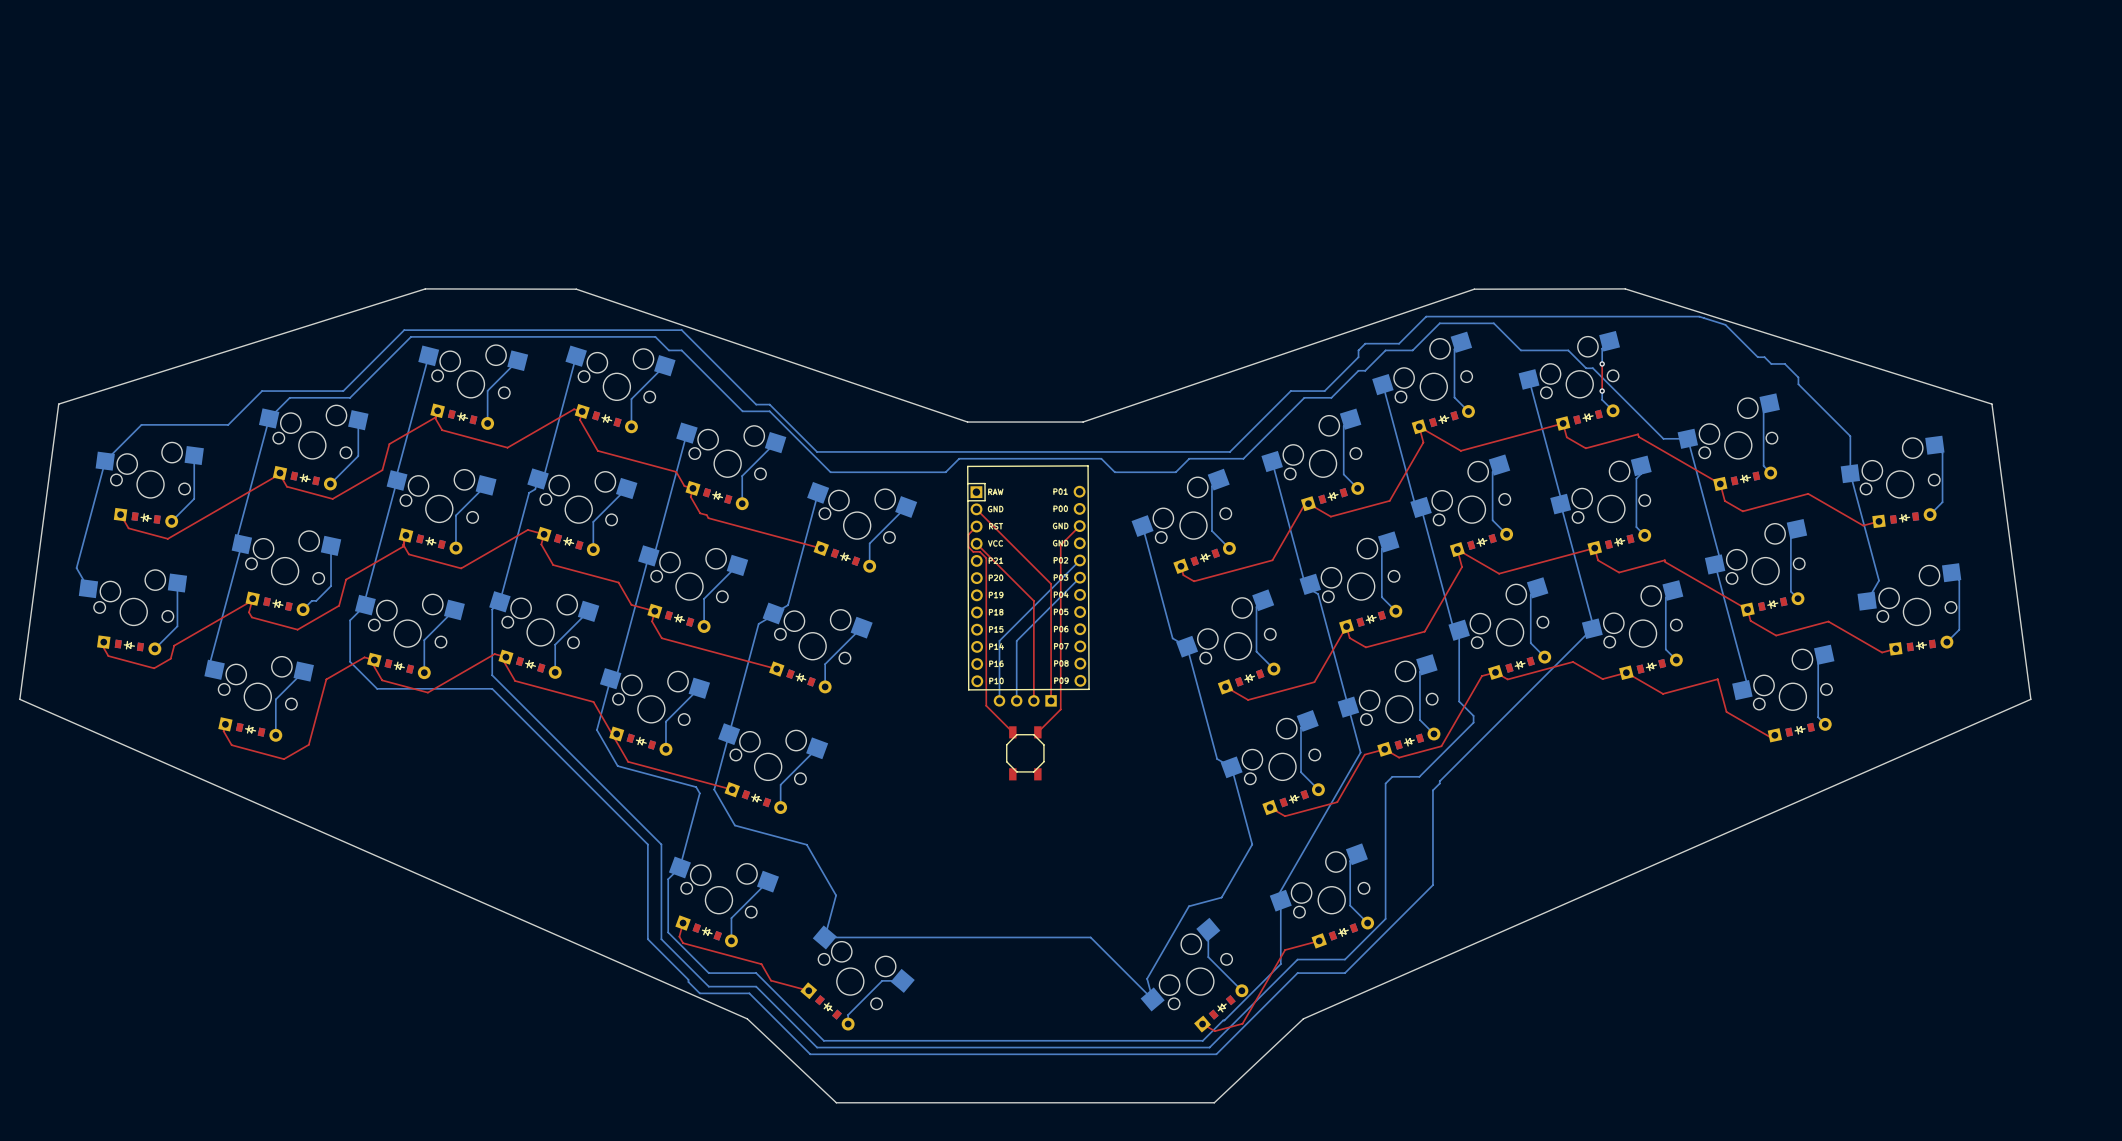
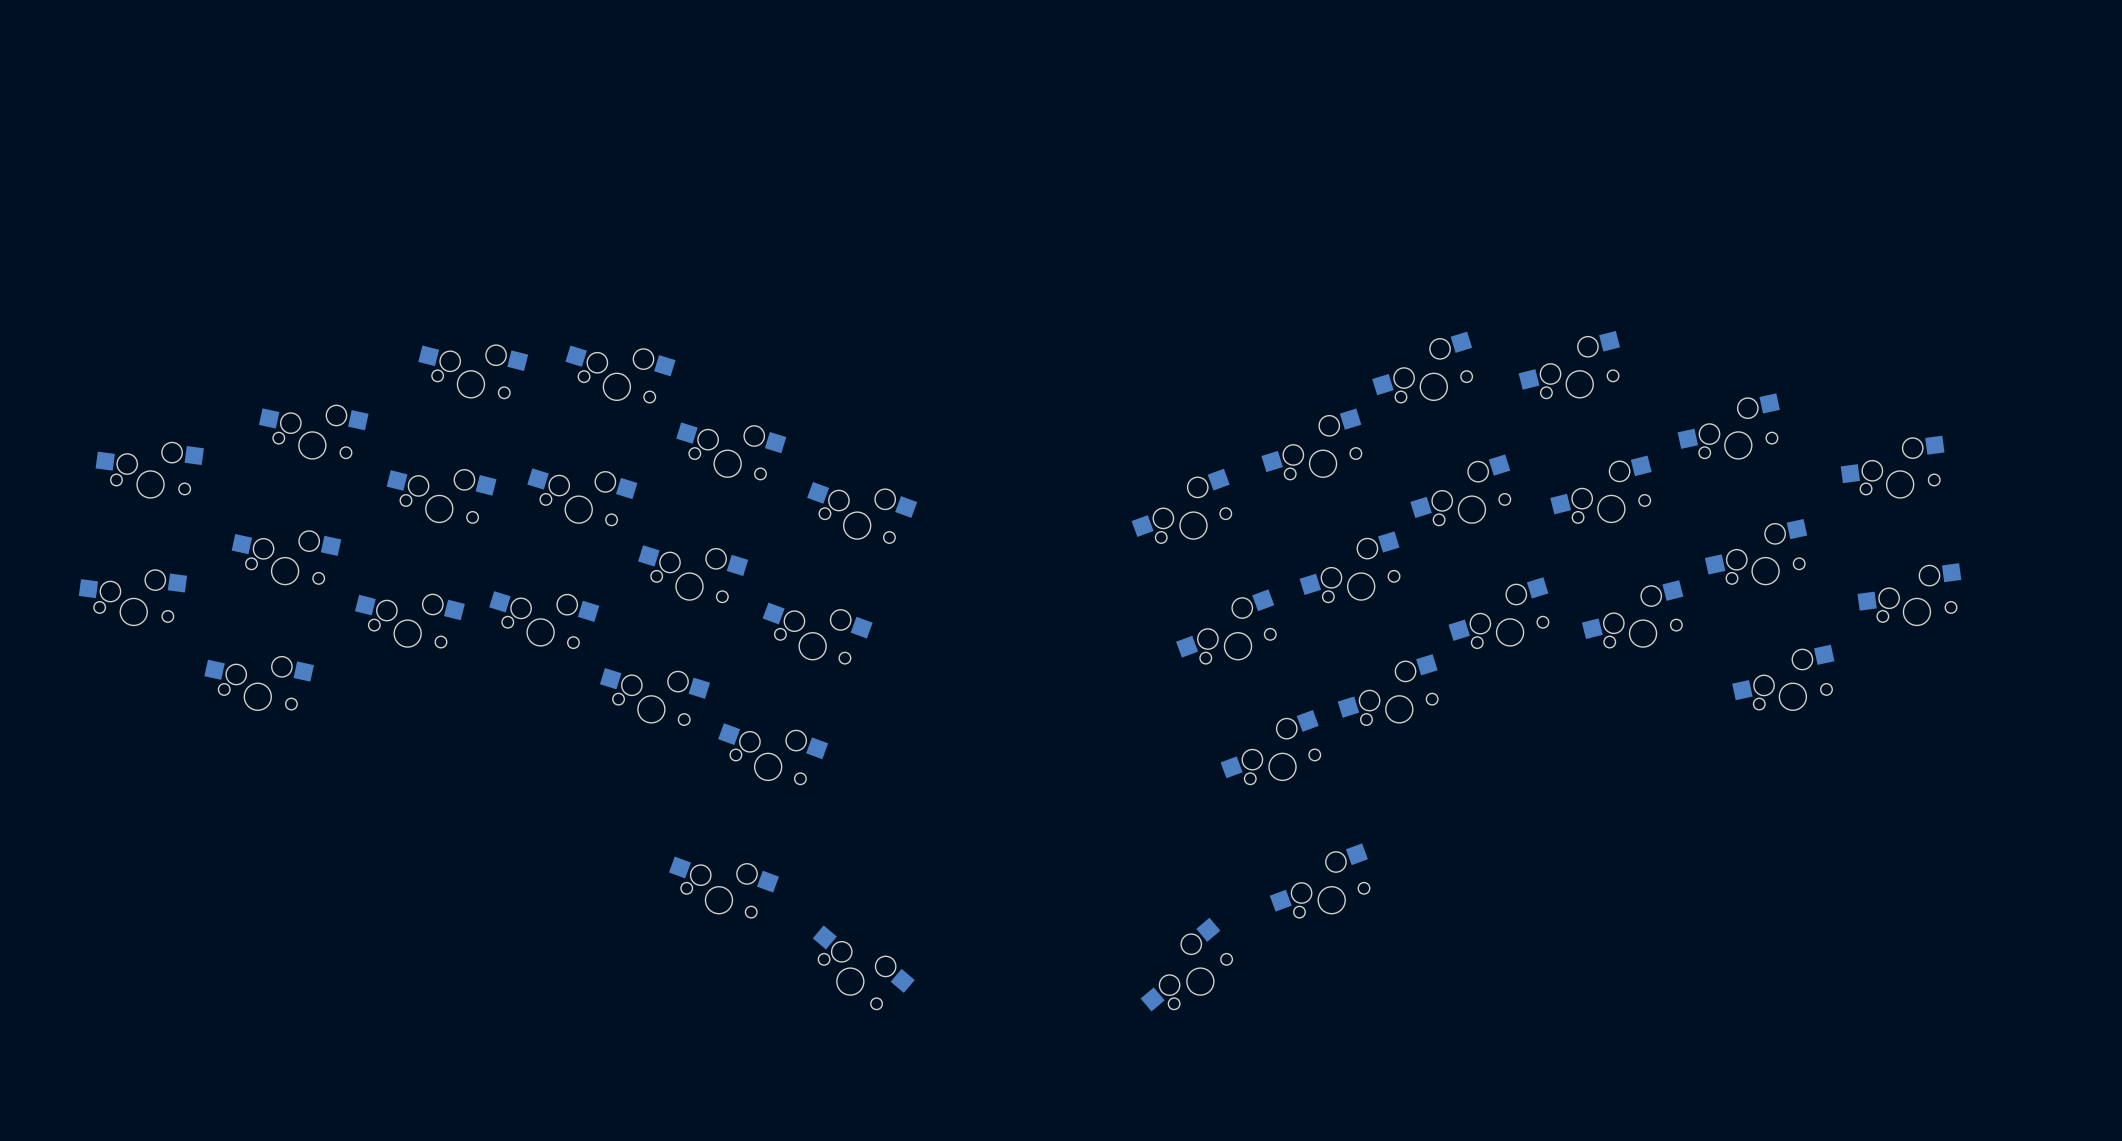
board edge: (425, 288) (58, 404) (19, 699) (747, 1018) (836, 1102) (1214, 1102) (1303, 1018) (2030, 699) (1991, 404) (1625, 288) (1474, 289) (1083, 422) (967, 422) (576, 289) (425, 288) -> none
bottom track: (1609, 341) (1602, 348) (1602, 363) -> none
bottom track: (1461, 342) (1454, 349) (1454, 397) (1468, 411) -> none
bottom track: (428, 355) (364, 603) (365, 605) (350, 620) (350, 661) (377, 688) (492, 688) (647, 844) (647, 939) (699, 993) (749, 993) (810, 1054) (1216, 1054) (1297, 973) (1344, 973) (1432, 885) (1432, 790) (1593, 626) (1529, 379) -> none
bottom track: (576, 356) (544, 475) (538, 478) (535, 489) (529, 492) (499, 601) (492, 609) (492, 675) (661, 844) (661, 939) (708, 986) (756, 986) (817, 1047) (1209, 1047) (1297, 959) (1344, 959) (1385, 918) (1385, 783) (1392, 776) (1419, 776) (1473, 722) (1473, 715) (1459, 701) (1459, 630) (1453, 626) (1421, 507) (1414, 503) (1382, 384) -> none
bottom track: (517, 360) (487, 390) (487, 423) -> none
top track: (1602, 363) (1602, 391) -> none
via: (1602, 363) -> none
bottom track: (664, 365) (631, 399) (631, 426) -> none
bottom track: (1602, 391) (1602, 399) (1613, 410) -> none
via: (1602, 391) -> none
bottom track: (1769, 403) (1763, 409) (1763, 465) (1770, 473) -> none
top track: (437, 410) (435, 418) (442, 430) (507, 447) (574, 409) (582, 411) (579, 419) (597, 450) (676, 471) (684, 486) (692, 488) (690, 496) (700, 513) (706, 515) (708, 518) (821, 548) -> none
part: (462, 416) -> none
top track: (435, 417) (389, 444) (382, 470) (332, 498) (286, 486) (279, 473) (167, 538) (128, 528) (120, 514) -> none
part: (1587, 417) -> none
part: (606, 418) -> none
bottom track: (1350, 419) (1343, 426) (1343, 474) (1357, 488) -> none
part: (1443, 419) -> none
bottom track: (358, 420) (358, 456) (330, 483) -> none
bottom track: (686, 433) (655, 552) (648, 555) (616, 675) (610, 678) (596, 730) (617, 766) (696, 787) (699, 793) (679, 867) (668, 879) (668, 932) (708, 973) (756, 973) (823, 1040) (1202, 1040) (1280, 964) (1280, 900) (1278, 893) (1360, 752) (1318, 594) (1311, 590) (1310, 584) (1304, 580) (1272, 461) -> none
bottom track: (775, 442) (742, 475) (742, 503) -> none
bottom track: (1934, 445) (1942, 452) (1942, 502) (1930, 514) -> none
bottom track: (194, 455) (194, 498) (171, 521) -> none
bottom track: (1499, 465) (1492, 471) (1492, 520) (1506, 534) -> none
bottom track: (1641, 465) (1641, 473) (1636, 478) (1636, 527) (1644, 535) -> none
part: (304, 478) -> none
part: (1745, 478) -> none
bottom track: (1218, 479) (1211, 486) (1211, 530) (1229, 548) -> none
bottom track: (486, 485) (455, 515) (455, 548) -> none
bottom track: (626, 488) (593, 521) (593, 549) -> none
bottom track: (818, 492) (788, 605) (758, 623) (714, 789) (734, 825) (806, 844) (836, 895) (824, 937) (1090, 937) (1152, 999) (1147, 978) (1188, 906) (1221, 897) (1252, 844) (1231, 767) (1217, 759) (1187, 646) (1172, 638) (1142, 526) -> none
part: (717, 495) -> none
part: (1332, 496) -> none
bottom track: (906, 507) (869, 543) (869, 566) -> none
top track: (976, 509) (1051, 583) (1051, 700) -> none
part: (145, 517) -> none
part: (1904, 518) -> none
top track: (1879, 521) (1863, 525) (1808, 493) (1742, 511) (1724, 500) (1720, 483) (1638, 436) (1638, 434) (1585, 448) (1566, 437) (1563, 423) (1460, 450) (1419, 426) (1423, 442) (1389, 500) (1330, 516) (1308, 503) (1304, 504) (1272, 560) (1194, 581) (1183, 575) (1181, 566) -> none
top track: (976, 526) (968, 534) (968, 547) (973, 551) (980, 551) (986, 558) (986, 705) (1012, 732) -> none
top track: (1079, 526) (1060, 545) (1060, 709) (1037, 732) -> none
bottom track: (1796, 529) (1790, 535) (1790, 591) (1797, 598) -> none
top track: (405, 535) (402, 546) (346, 579) (339, 605) (297, 629) (251, 617) (249, 612) (252, 598) -> none
part: (430, 541) -> none
part: (568, 541) -> none
bottom track: (1388, 541) (1381, 548) (1381, 597) (1395, 611) -> none
part: (1481, 542) -> none
part: (1619, 542) -> none
top track: (976, 543) (1033, 600) (1033, 700) -> none
top track: (403, 544) (408, 554) (461, 568) (527, 529) (544, 534) (541, 544) (553, 565) (618, 582) (631, 604) (654, 611) (652, 621) (661, 638) (776, 669) -> none
bottom track: (331, 545) (331, 586) (316, 600) (311, 600) (303, 609) -> none
part: (844, 556) -> none
part: (1204, 557) -> none
bottom track: (1079, 560) (999, 640) (999, 700) -> none
bottom track: (737, 565) (704, 598) (704, 626) -> none
bottom track: (1951, 572) (1959, 580) (1959, 629) (1946, 642) -> none
part: (1028, 577) -> none
bottom track: (1079, 577) (1016, 640) (1016, 700) -> none
bottom track: (177, 583) (177, 626) (154, 648) -> none
bottom track: (1537, 587) (1530, 594) (1530, 643) (1544, 657) -> none
bottom track: (88, 588) (76, 568) (105, 461) (141, 424) (228, 424) (262, 391) (343, 391) (404, 330) (681, 330) (756, 404) (769, 404) (817, 451) (1229, 451) (1290, 391) (1324, 391) (1358, 357) (1358, 350) (1365, 343) (1399, 343) (1426, 316) (1699, 316) (1725, 324) (1757, 357) (1764, 357) (1771, 363) (1784, 363) (1798, 377) (1798, 384) (1850, 436) (1850, 473) (1879, 580) (1867, 601) -> none
bottom track: (1672, 590) (1665, 597) (1665, 649) (1676, 660) -> none
top track: (252, 600) (174, 645) (170, 658) (154, 668) (108, 656) (102, 646) (103, 642) -> none
bottom track: (1263, 600) (1256, 607) (1256, 651) (1273, 669) -> none
part: (277, 603) -> none
part: (1772, 604) -> none
bottom track: (454, 609) (424, 640) (424, 672) -> none
bottom track: (588, 611) (555, 644) (555, 672) -> none
part: (678, 618) -> none
part: (1370, 619) -> none
bottom track: (861, 627) (825, 664) (825, 686) -> none
part: (129, 645) -> none
part: (1921, 645) -> none
top track: (1895, 648) (1882, 652) (1828, 621) (1776, 635) (1750, 620) (1747, 609) (1664, 560) (1619, 572) (1598, 560) (1594, 548) (1499, 573) (1457, 549) (1462, 567) (1424, 631) (1365, 647) (1349, 638) (1346, 626) (1314, 682) (1248, 699) (1225, 686) -> none
bottom track: (1824, 654) (1818, 660) (1818, 717) (1825, 724) -> none
part: (530, 664) -> none
bottom track: (1426, 664) (1419, 671) (1419, 720) (1433, 734) -> none
part: (398, 665) -> none
part: (1519, 665) -> none
part: (1650, 666) -> none
bottom track: (214, 669) (210, 662) (241, 544) (237, 536) (269, 418) (289, 397) (350, 397) (411, 336) (655, 336) (668, 350) (681, 350) (742, 411) (769, 411) (830, 472) (945, 472) (959, 458) (1101, 458) (1114, 472) (1175, 472) (1189, 458) (1243, 458) (1304, 397) (1331, 397) (1358, 370) (1365, 370) (1385, 350) (1412, 350) (1439, 323) (1493, 323) (1520, 350) (1568, 350) (1586, 368) (1592, 368) (1663, 438) (1687, 438) (1719, 556) (1715, 564) (1746, 682) (1742, 690) -> none
bottom track: (303, 671) (275, 699) (275, 735) -> none
part: (800, 677) -> none
part: (1249, 678) -> none
bottom track: (699, 688) (665, 721) (665, 749) -> none
part: (1025, 700) -> none
bottom track: (1307, 720) (1301, 727) (1301, 772) (1318, 789) -> none
top track: (225, 724) (223, 731) (231, 745) (283, 759) (308, 744) (326, 679) (364, 657) (374, 660) (373, 664) (382, 680) (427, 692) (494, 654) (505, 657) (504, 662) (515, 680) (593, 701) (611, 732) (616, 734) (615, 739) (628, 761) (732, 789) -> none
part: (250, 729) -> none
part: (1799, 730) -> none
top track: (1774, 735) (1769, 736) (1726, 711) (1717, 679) (1663, 693) (1626, 672) (1602, 679) (1573, 661) (1507, 679) (1495, 672) (1482, 676) (1441, 746) (1399, 757) (1384, 749) (1364, 754) (1337, 802) (1285, 816) (1270, 807) -> none
part: (640, 741) -> none
part: (1408, 742) -> none
bottom track: (817, 748) (780, 784) (780, 807) -> none
part: (1025, 753) -> none
part: (755, 797) -> none
part: (1293, 799) -> none
bottom track: (1356, 854) (1350, 860) (1350, 905) (1367, 923) -> none
bottom track: (767, 881) (731, 918) (731, 940) -> none
top track: (683, 923) (679, 936) (683, 943) (761, 964) (771, 980) (808, 990) -> none
bottom track: (1208, 929) (1208, 957) (1241, 990) -> none
part: (706, 931) -> none
part: (1342, 932) -> none
top track: (1319, 940) (1285, 950) (1242, 1023) (1214, 1031) (1202, 1024) -> none
bottom track: (902, 980) (882, 980) (848, 1014) (848, 1024) -> none
part: (827, 1006) -> none
part: (1221, 1008) -> none

